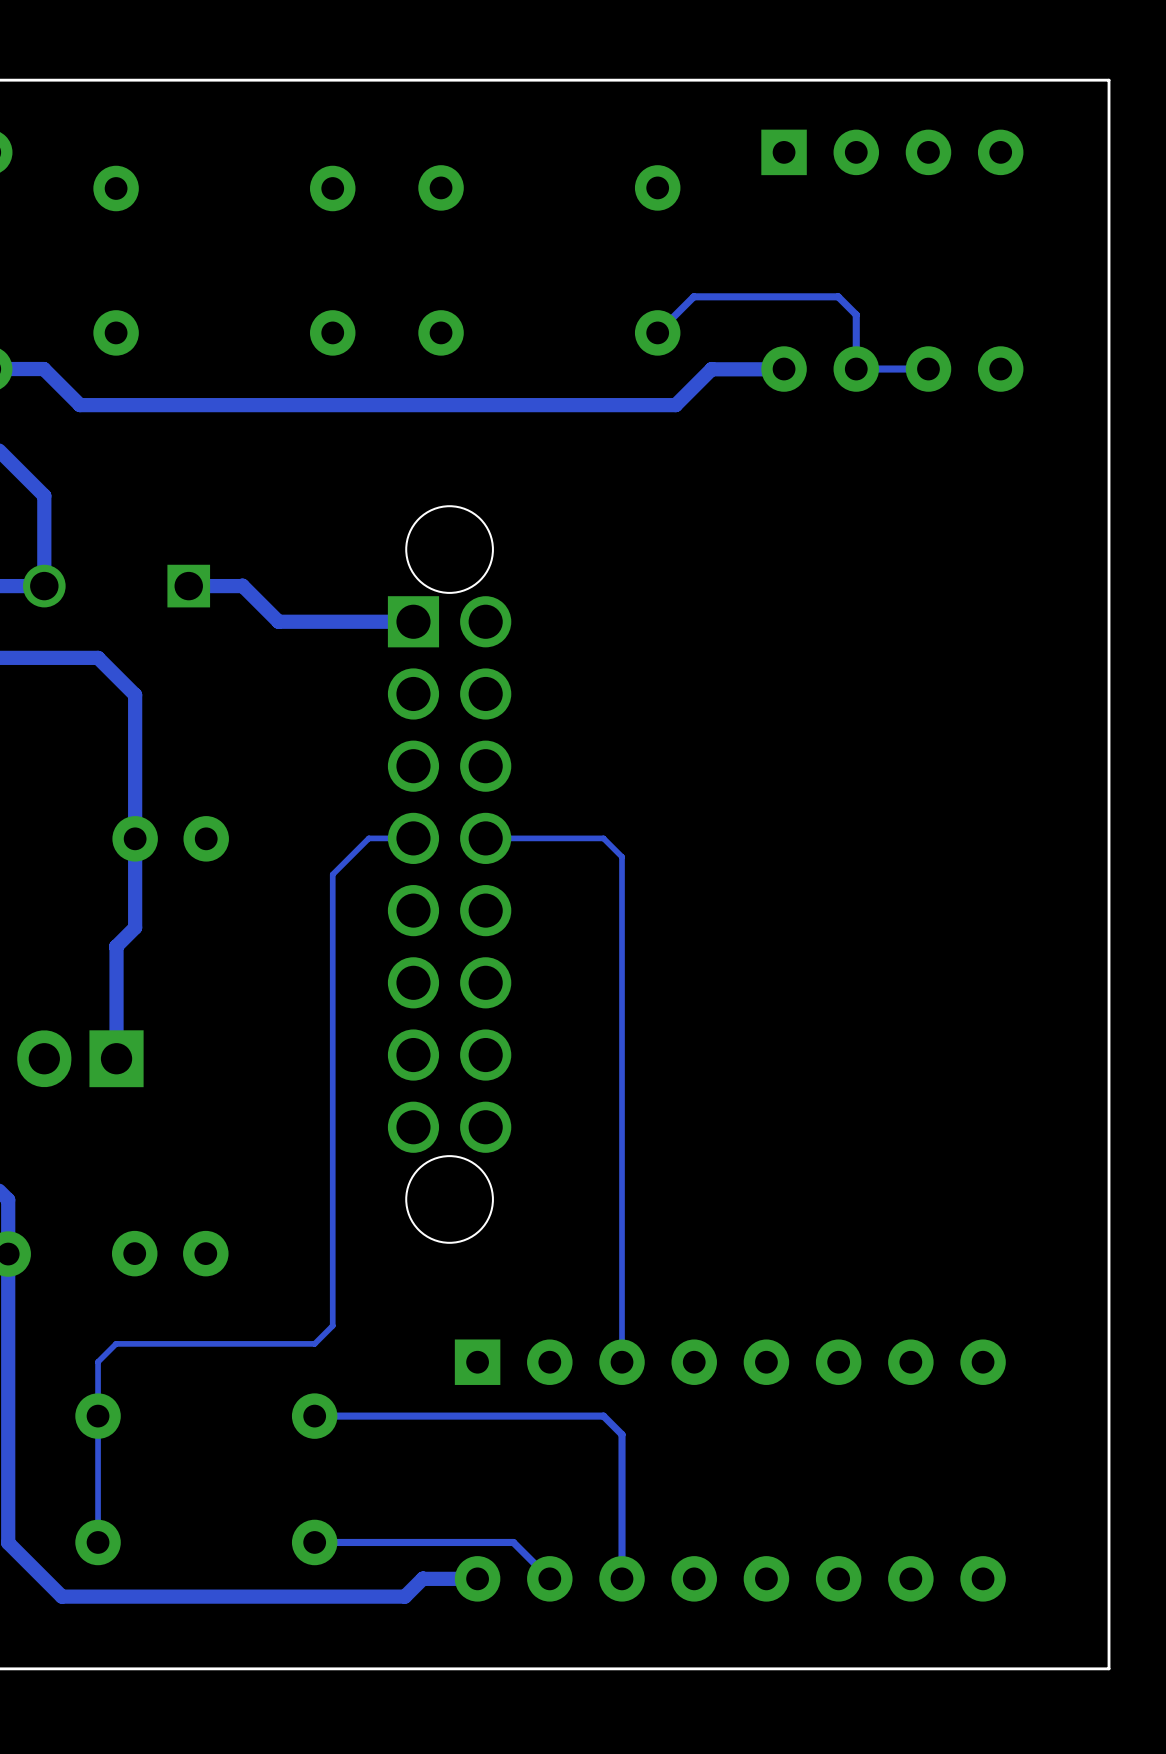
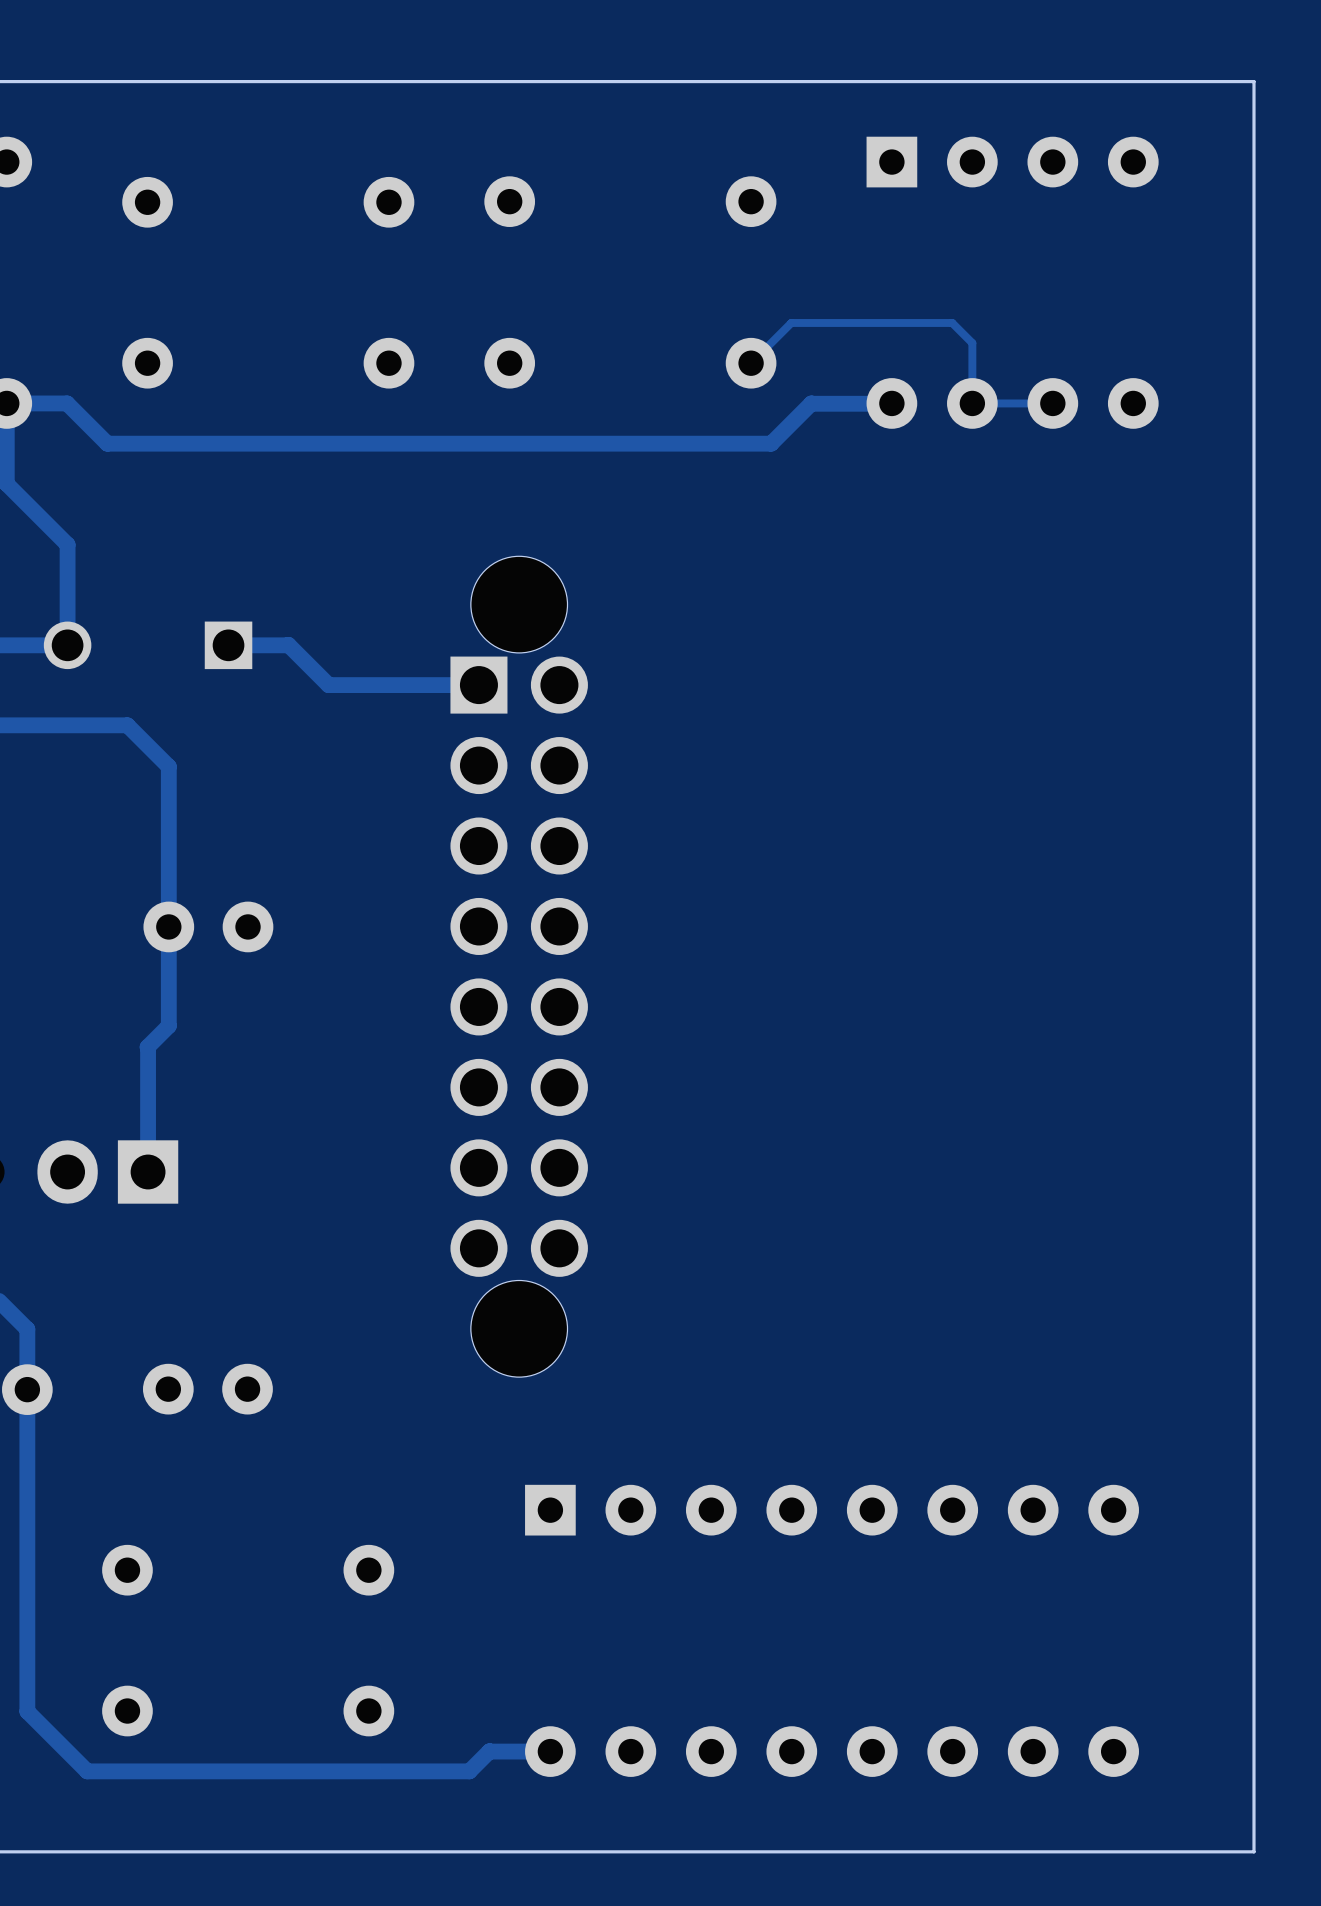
track: (413, 838) (368, 838) (332, 874) (332, 1325) (314, 1343) (116, 1343) (98, 1361) (98, 1542) -> none
track: (485, 838) (603, 838) (622, 856) (622, 1362) -> none
track: (314, 1416) (603, 1416) (622, 1434) (622, 1578) -> none
track: (314, 1542) (513, 1542) (549, 1578) -> none

